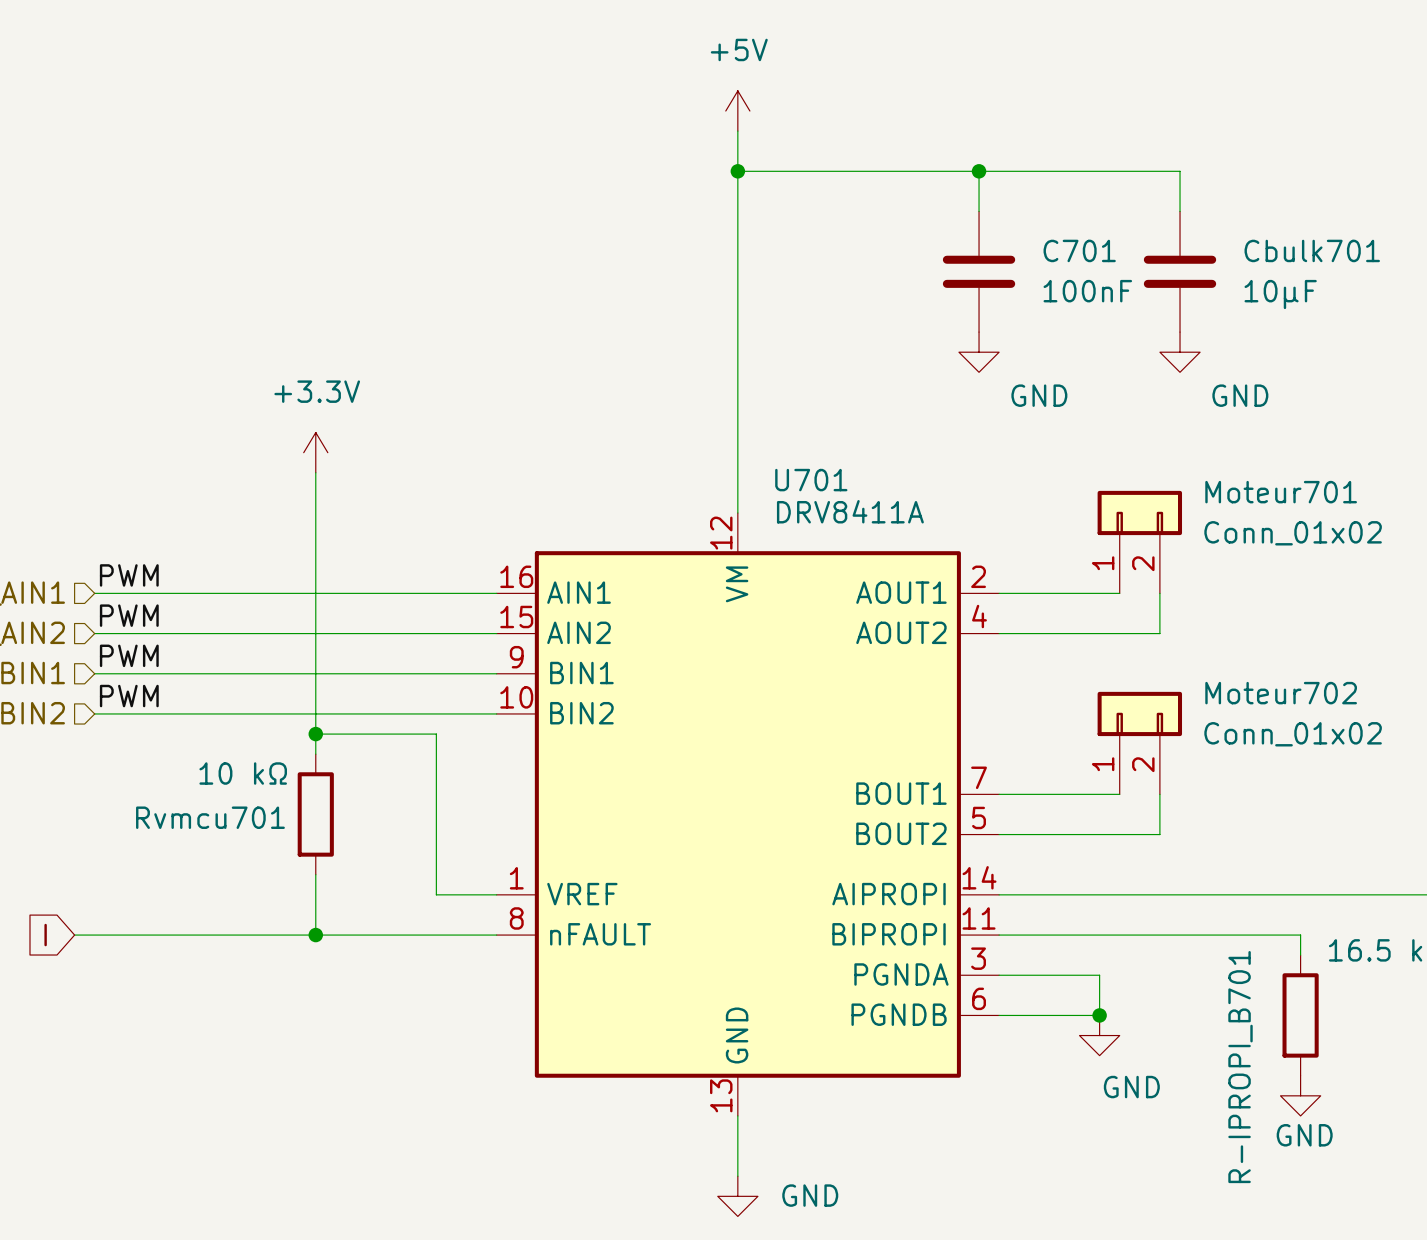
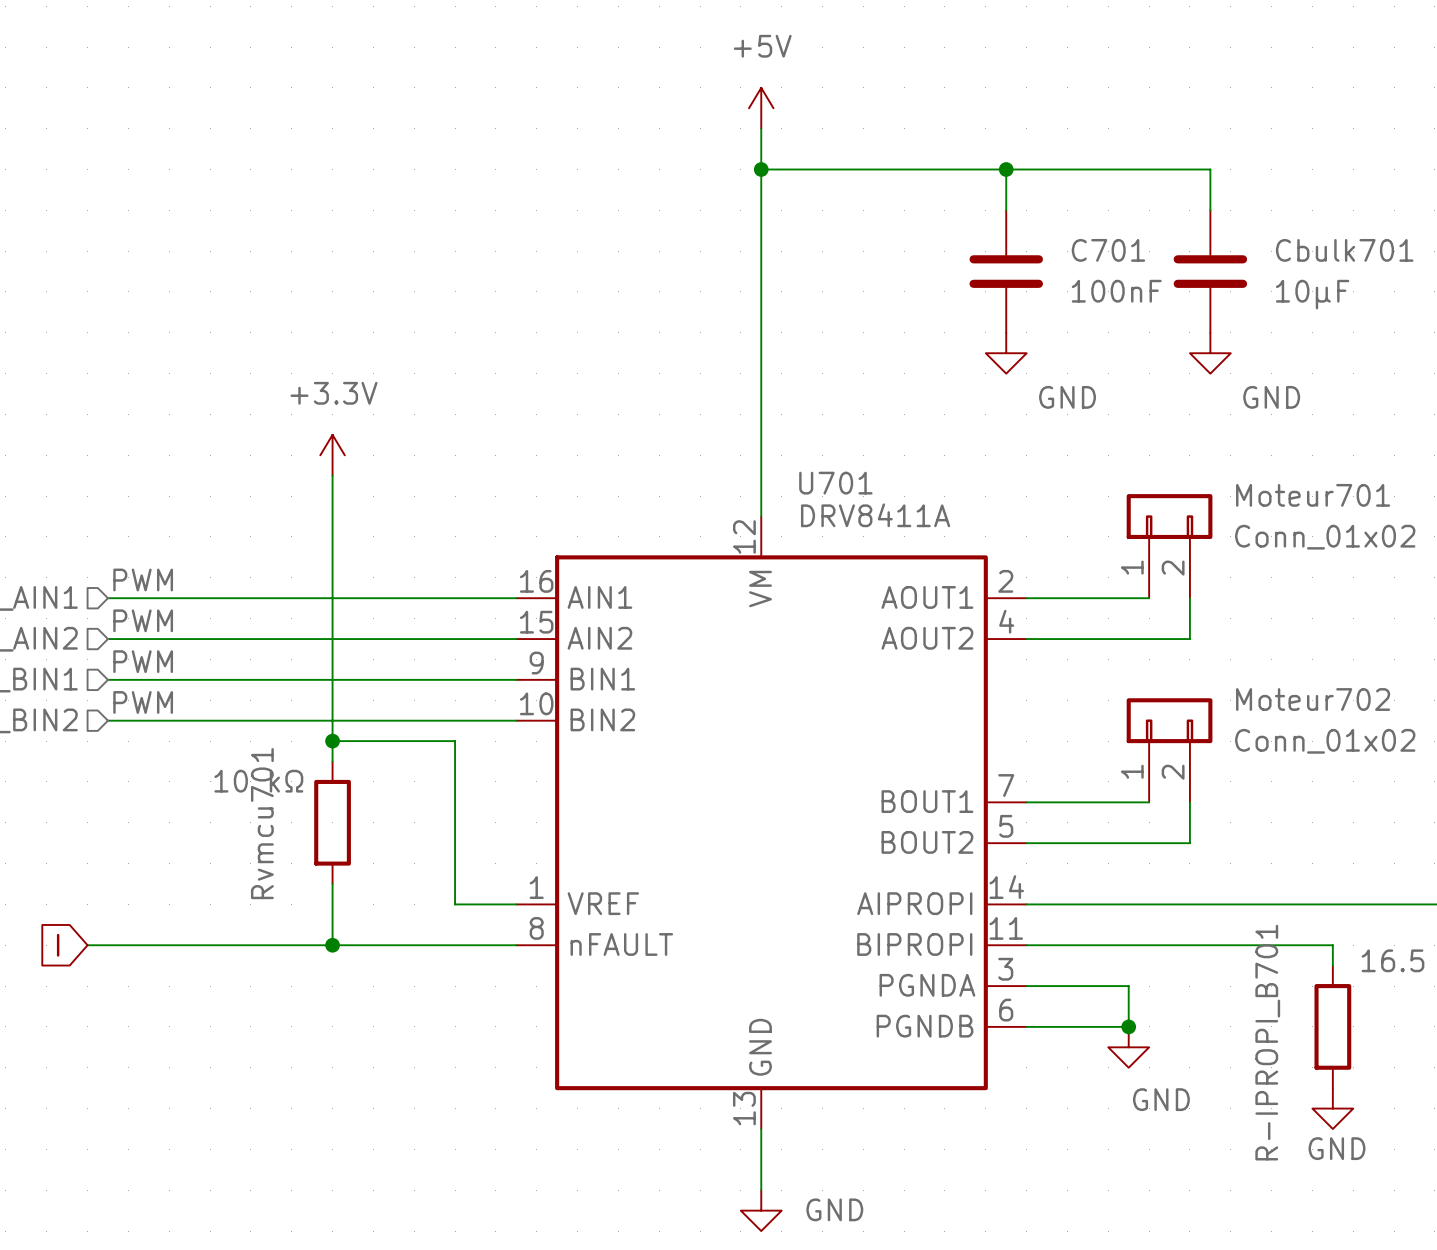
Rvmcu701 name rotation: 0° (210, 817) -> 90° counterclockwise (262, 823)
R-IPROPI_B701 name position: R-IPROPI_B701 (1240, 1067) -> R-IPROPI_B701 (1267, 1042)

